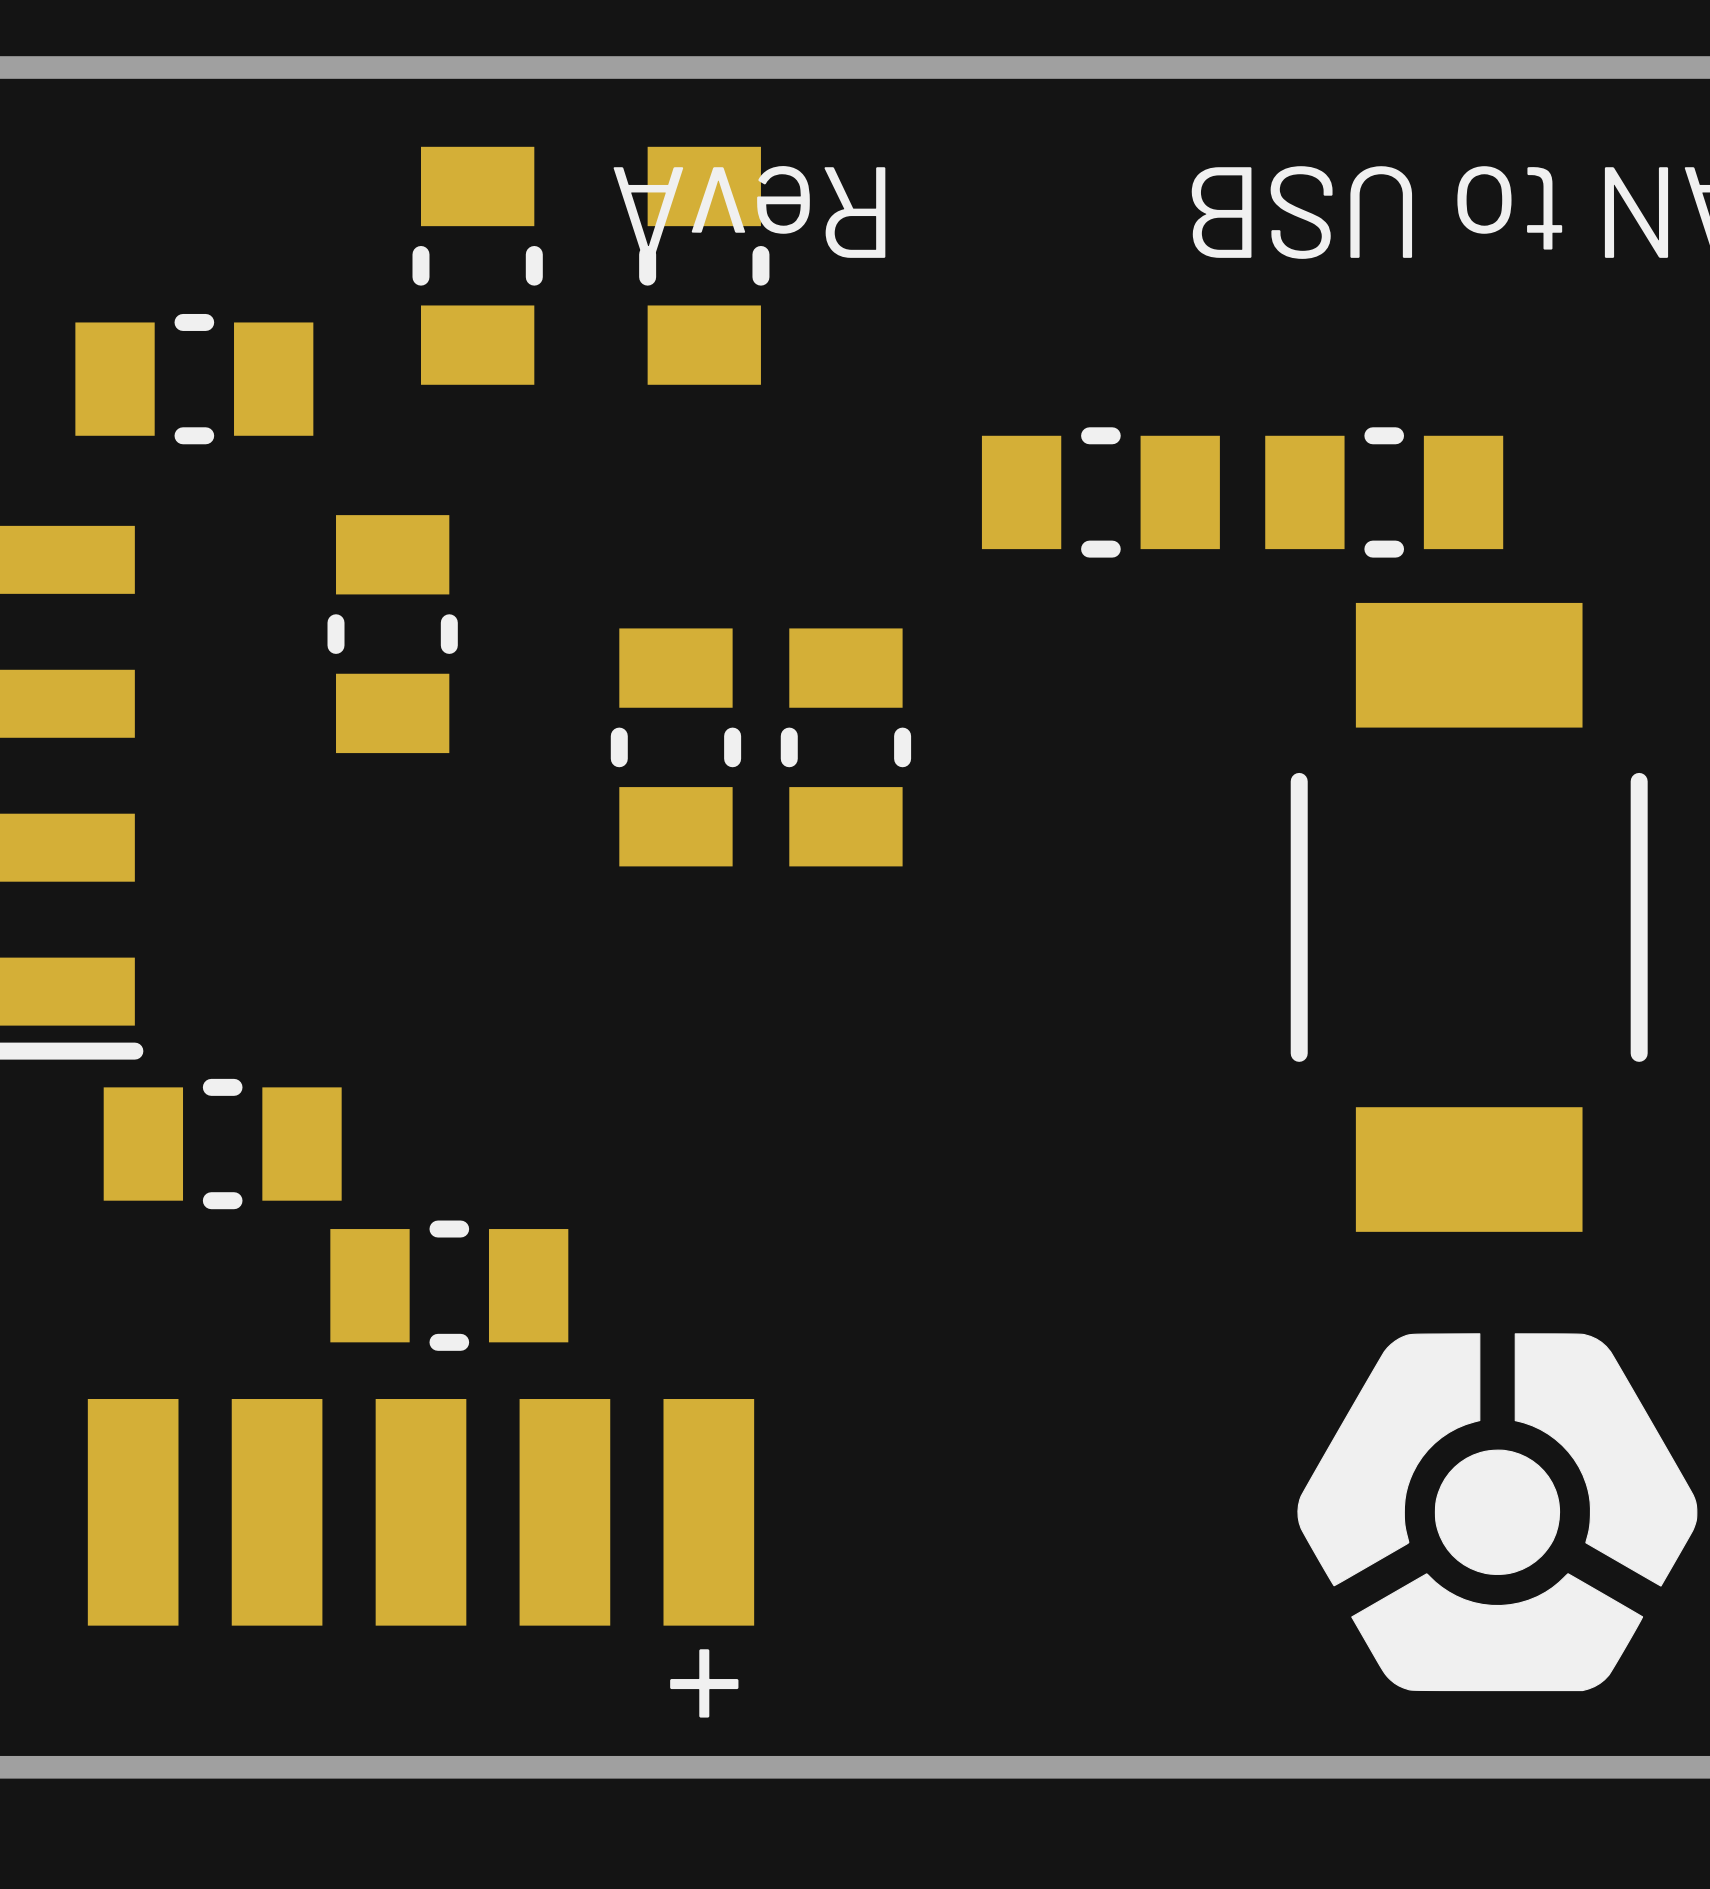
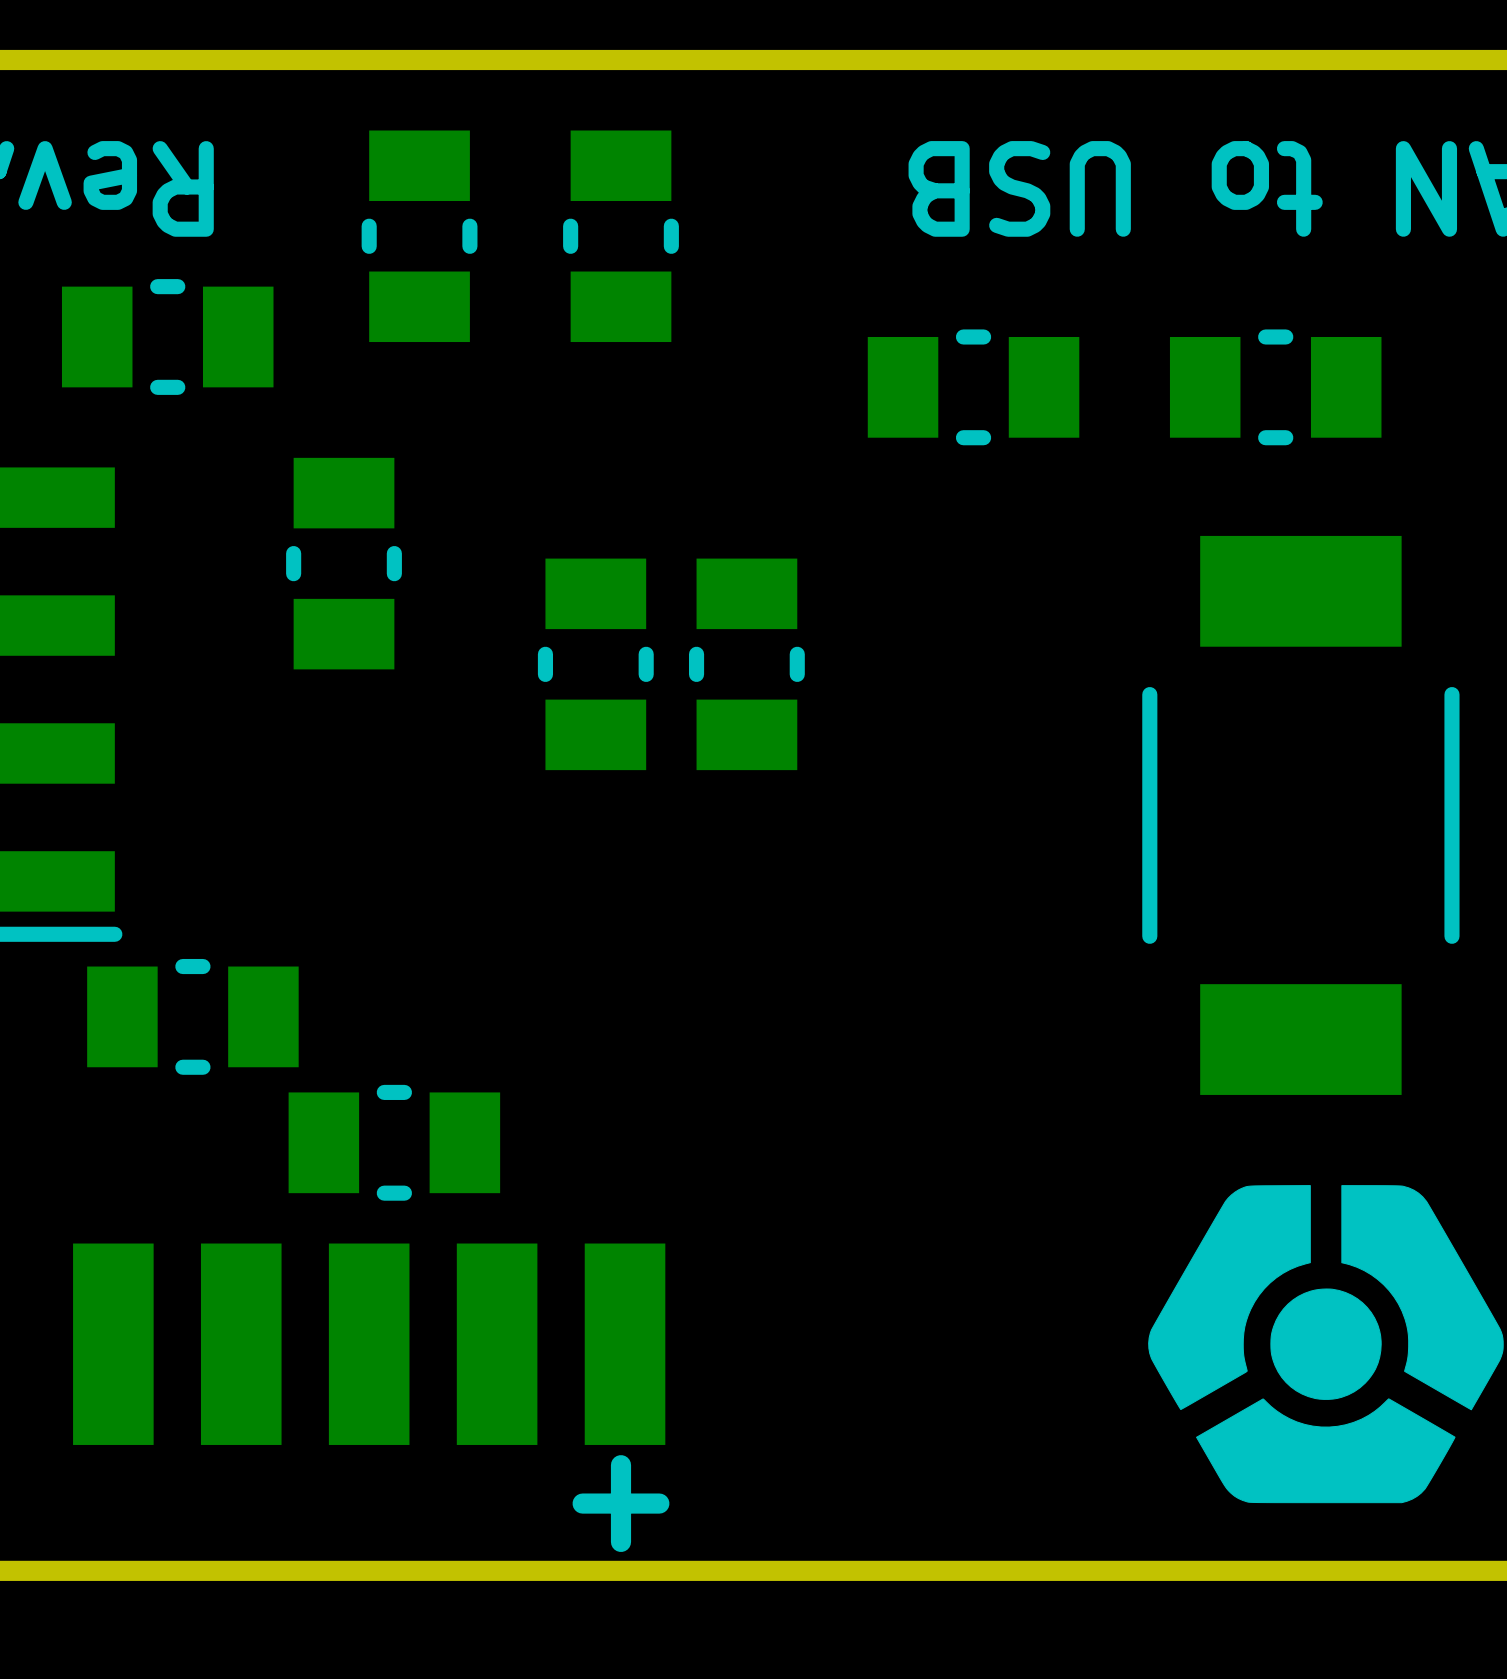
part position: (1100, 492) -> (973, 387)
part position: (1384, 492) -> (1275, 387)

